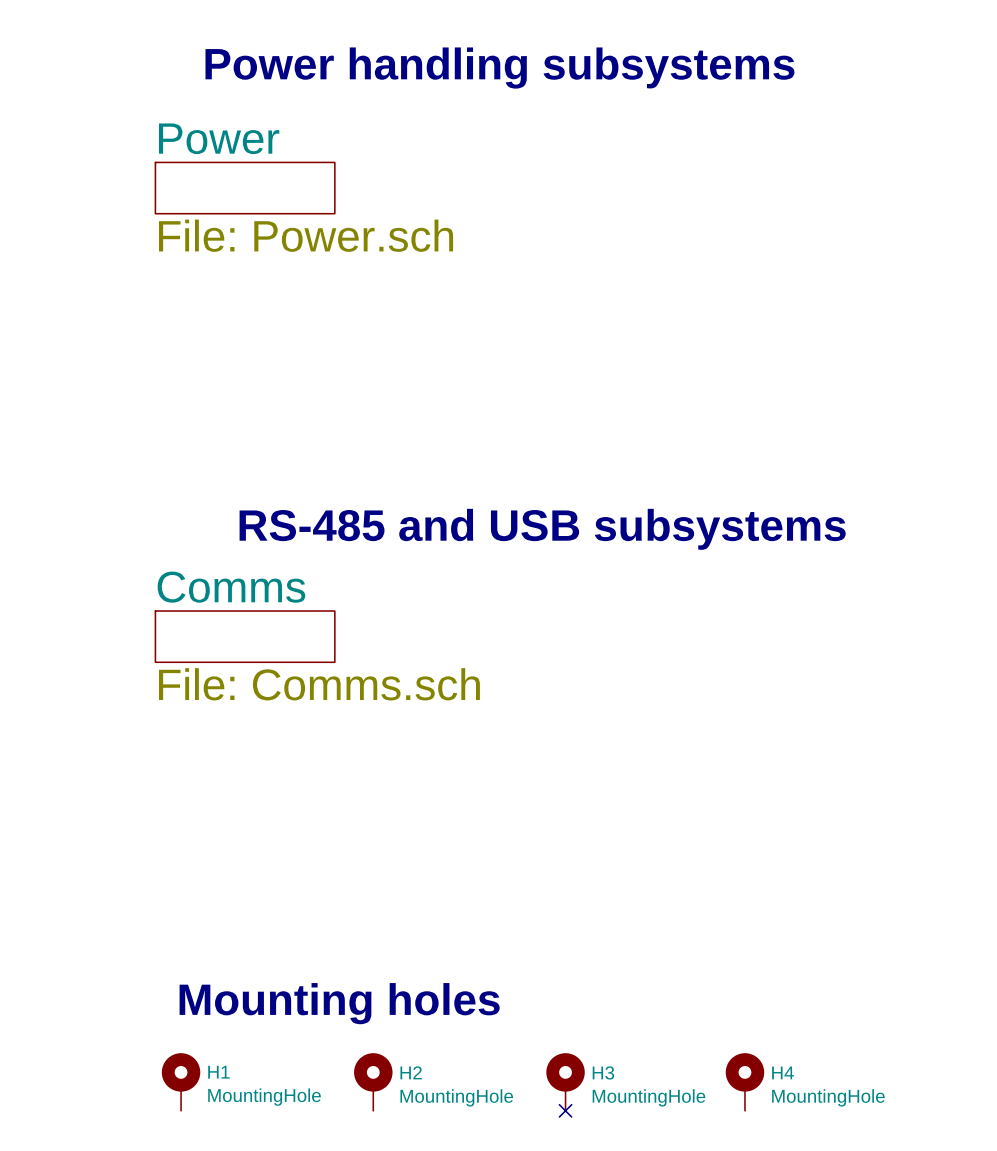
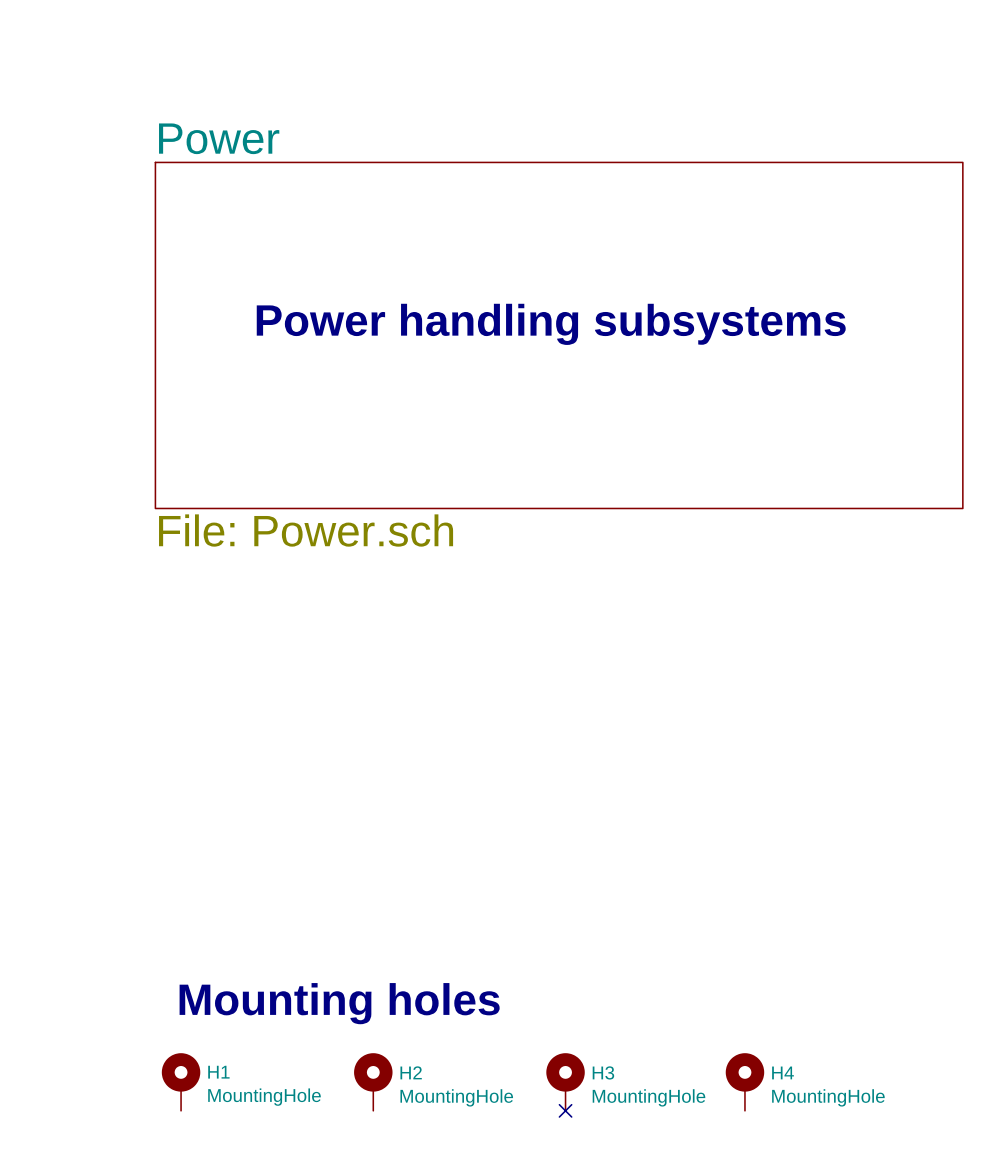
text: Power handling subsystems (499, 68) -> none
sheet Power: File: Power.sch (245, 188) -> none
text: none -> Power handling subsystems (551, 324)
sheet Power: none -> File: Power.sch (559, 335)
text: RS-485 and USB subsystems (542, 529) -> none
sheet Comms: File: Comms.sch (245, 636) -> none

